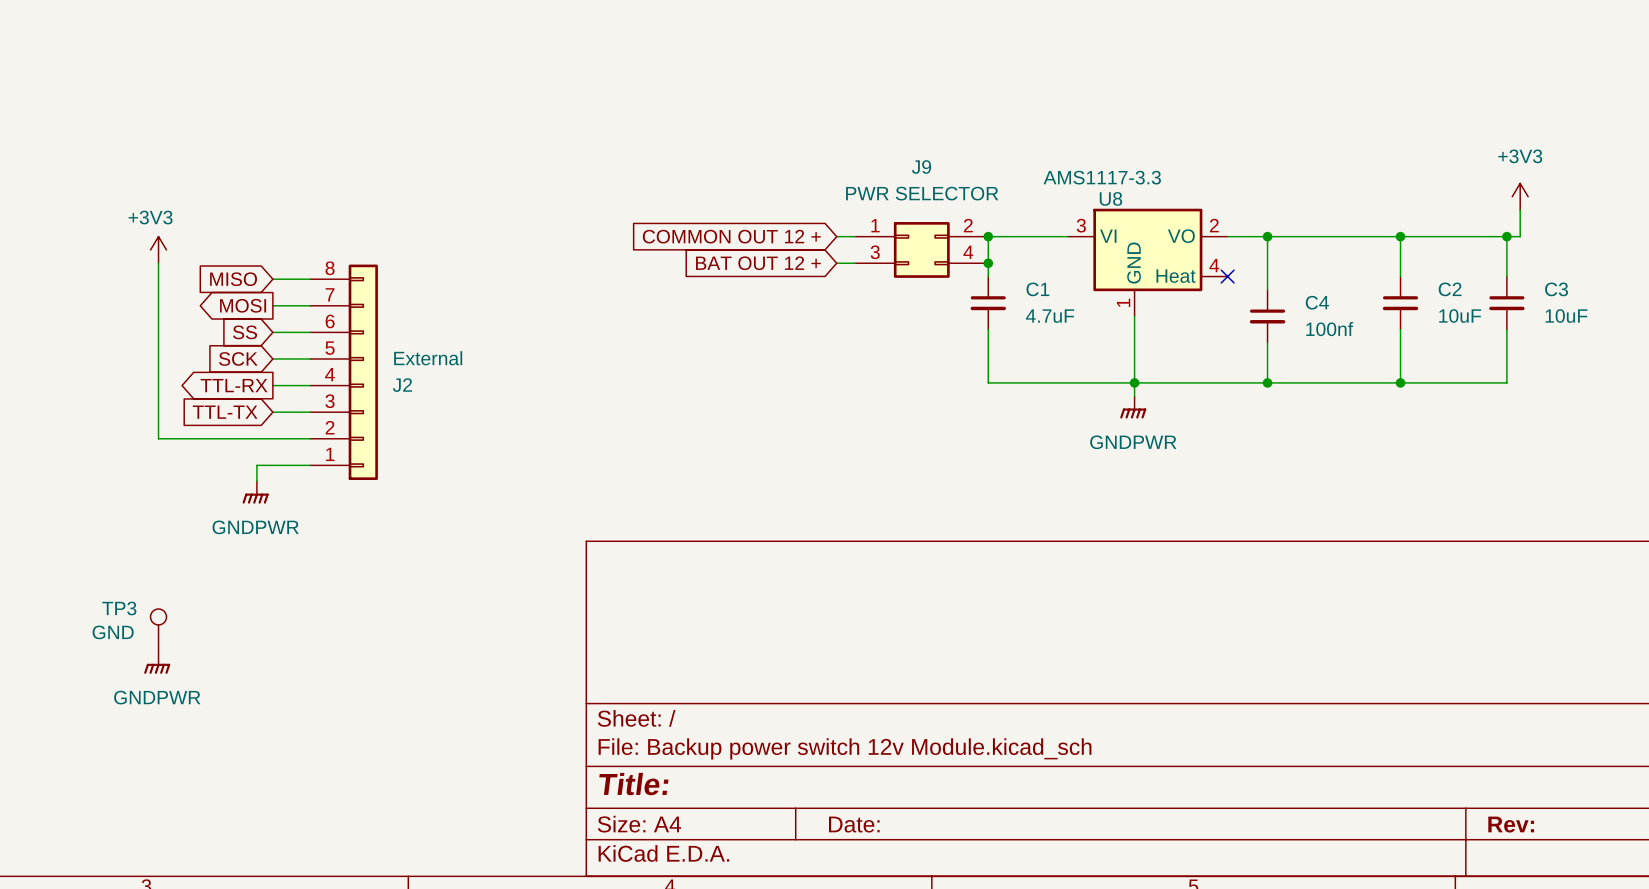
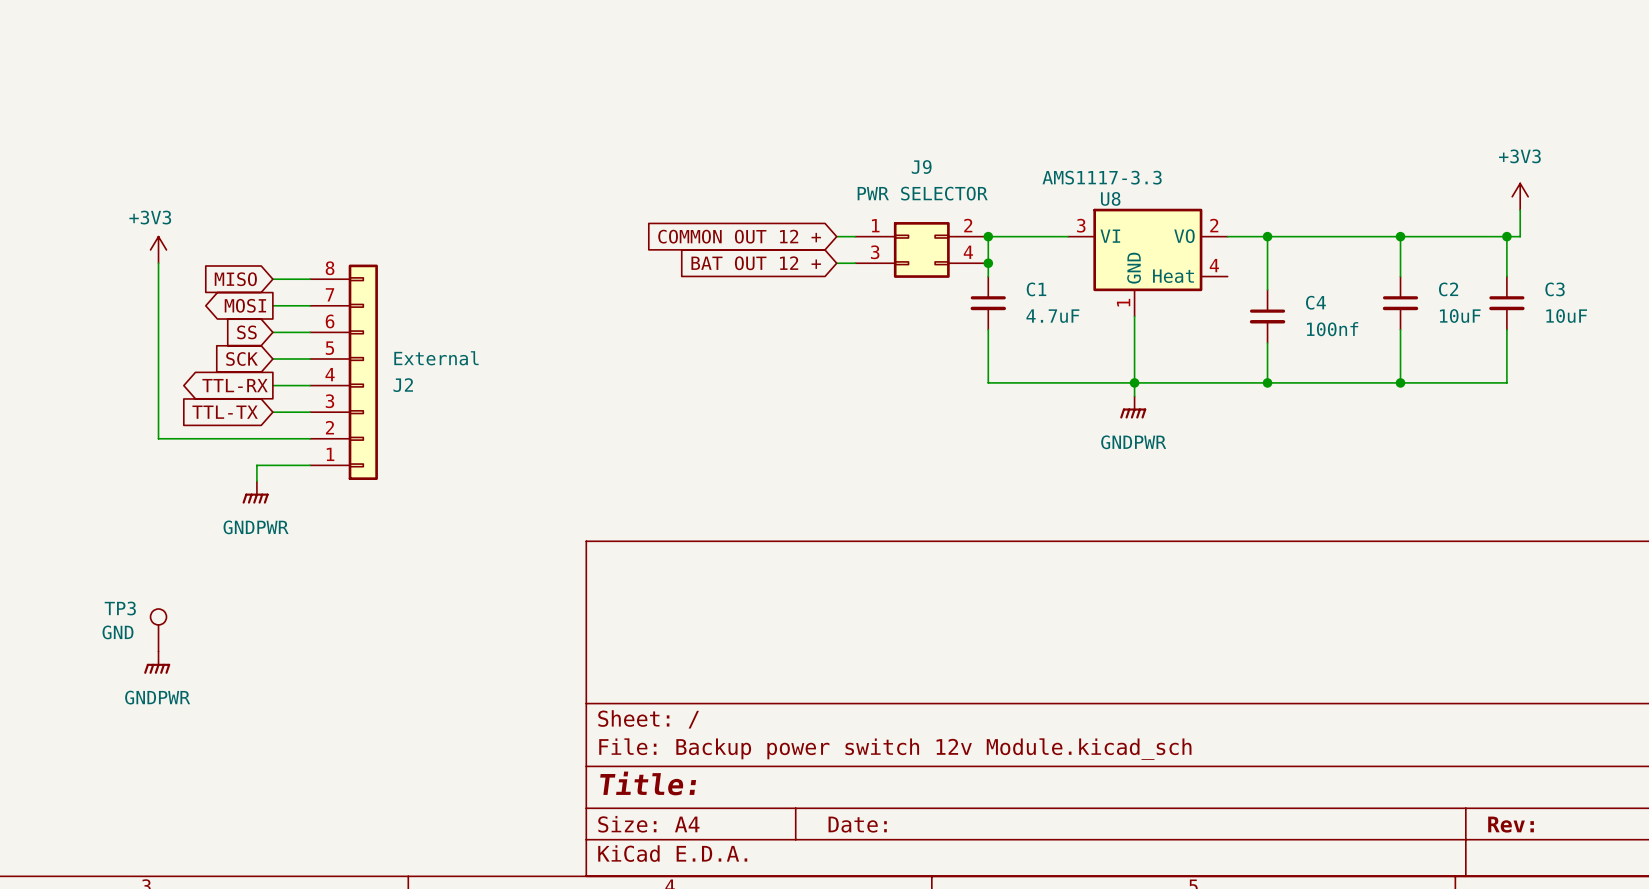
no-connect mark: (1227, 276) -> none

